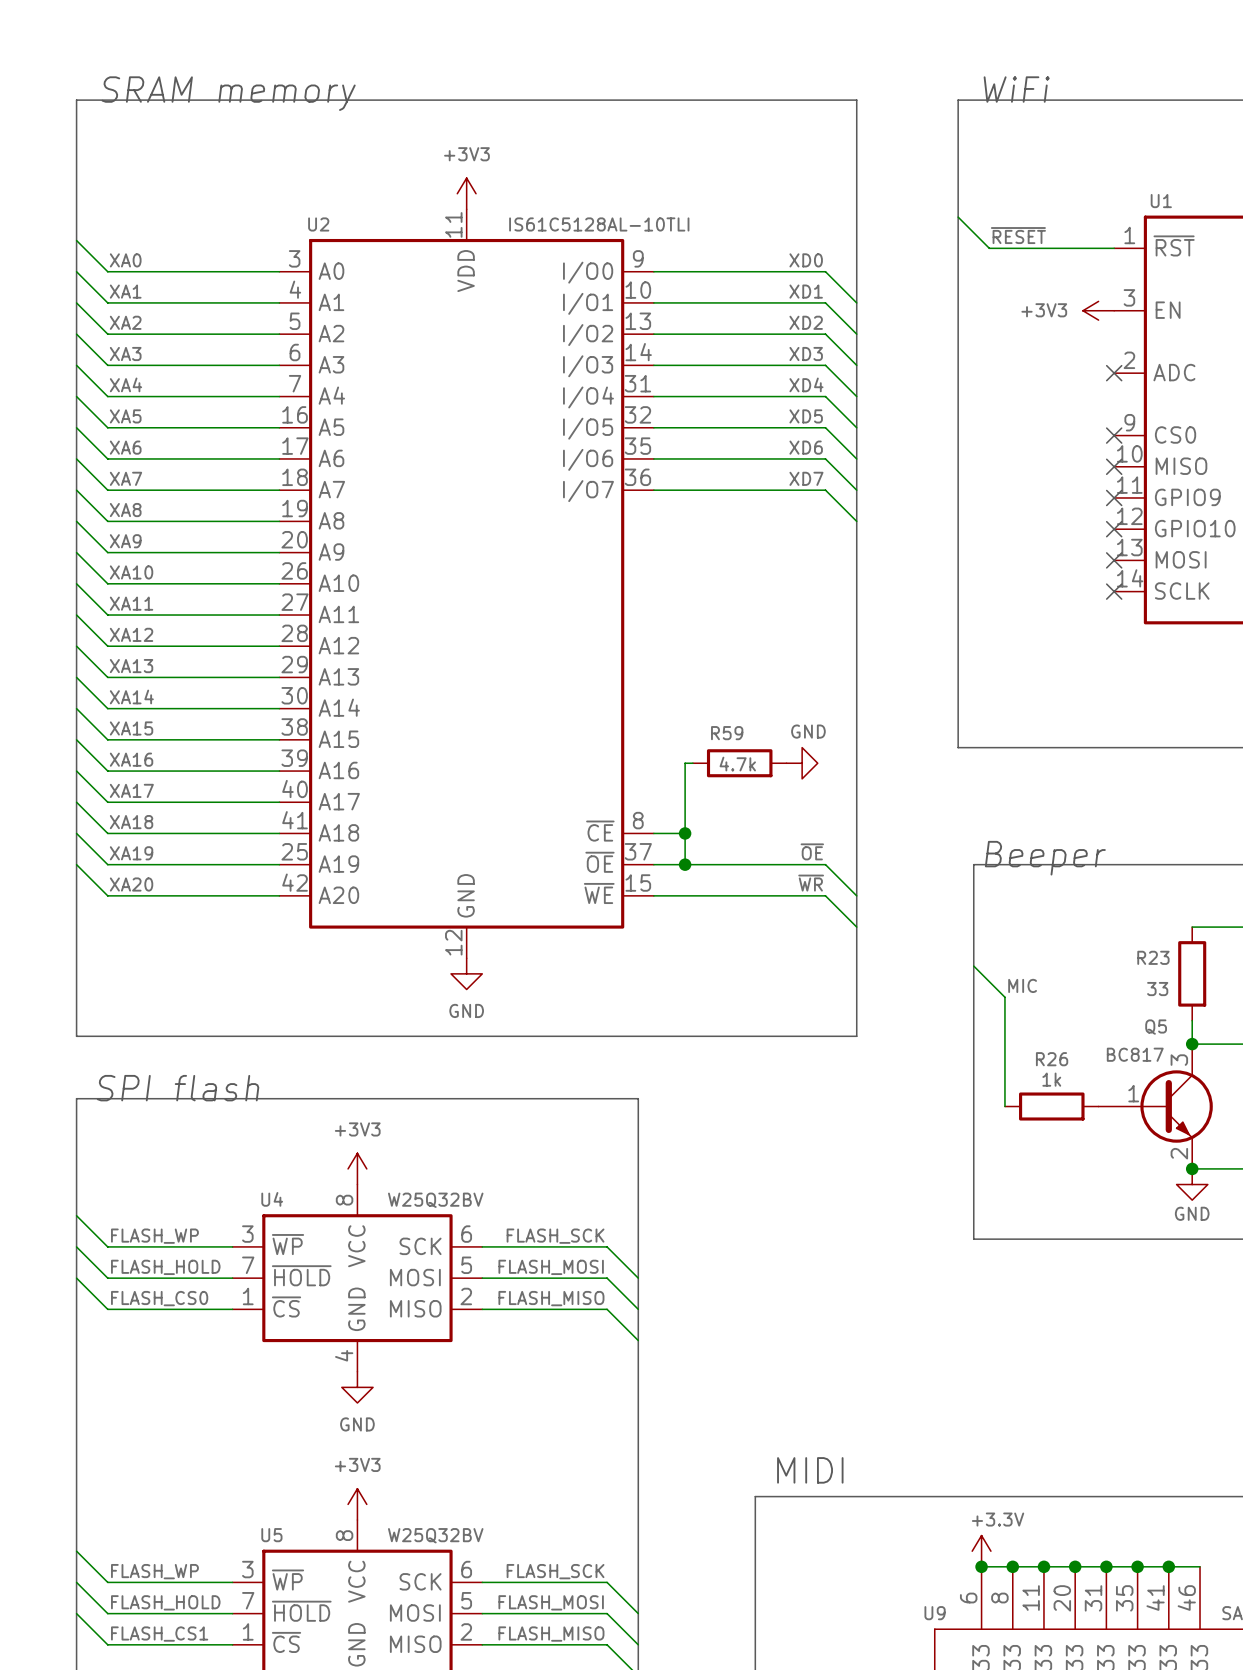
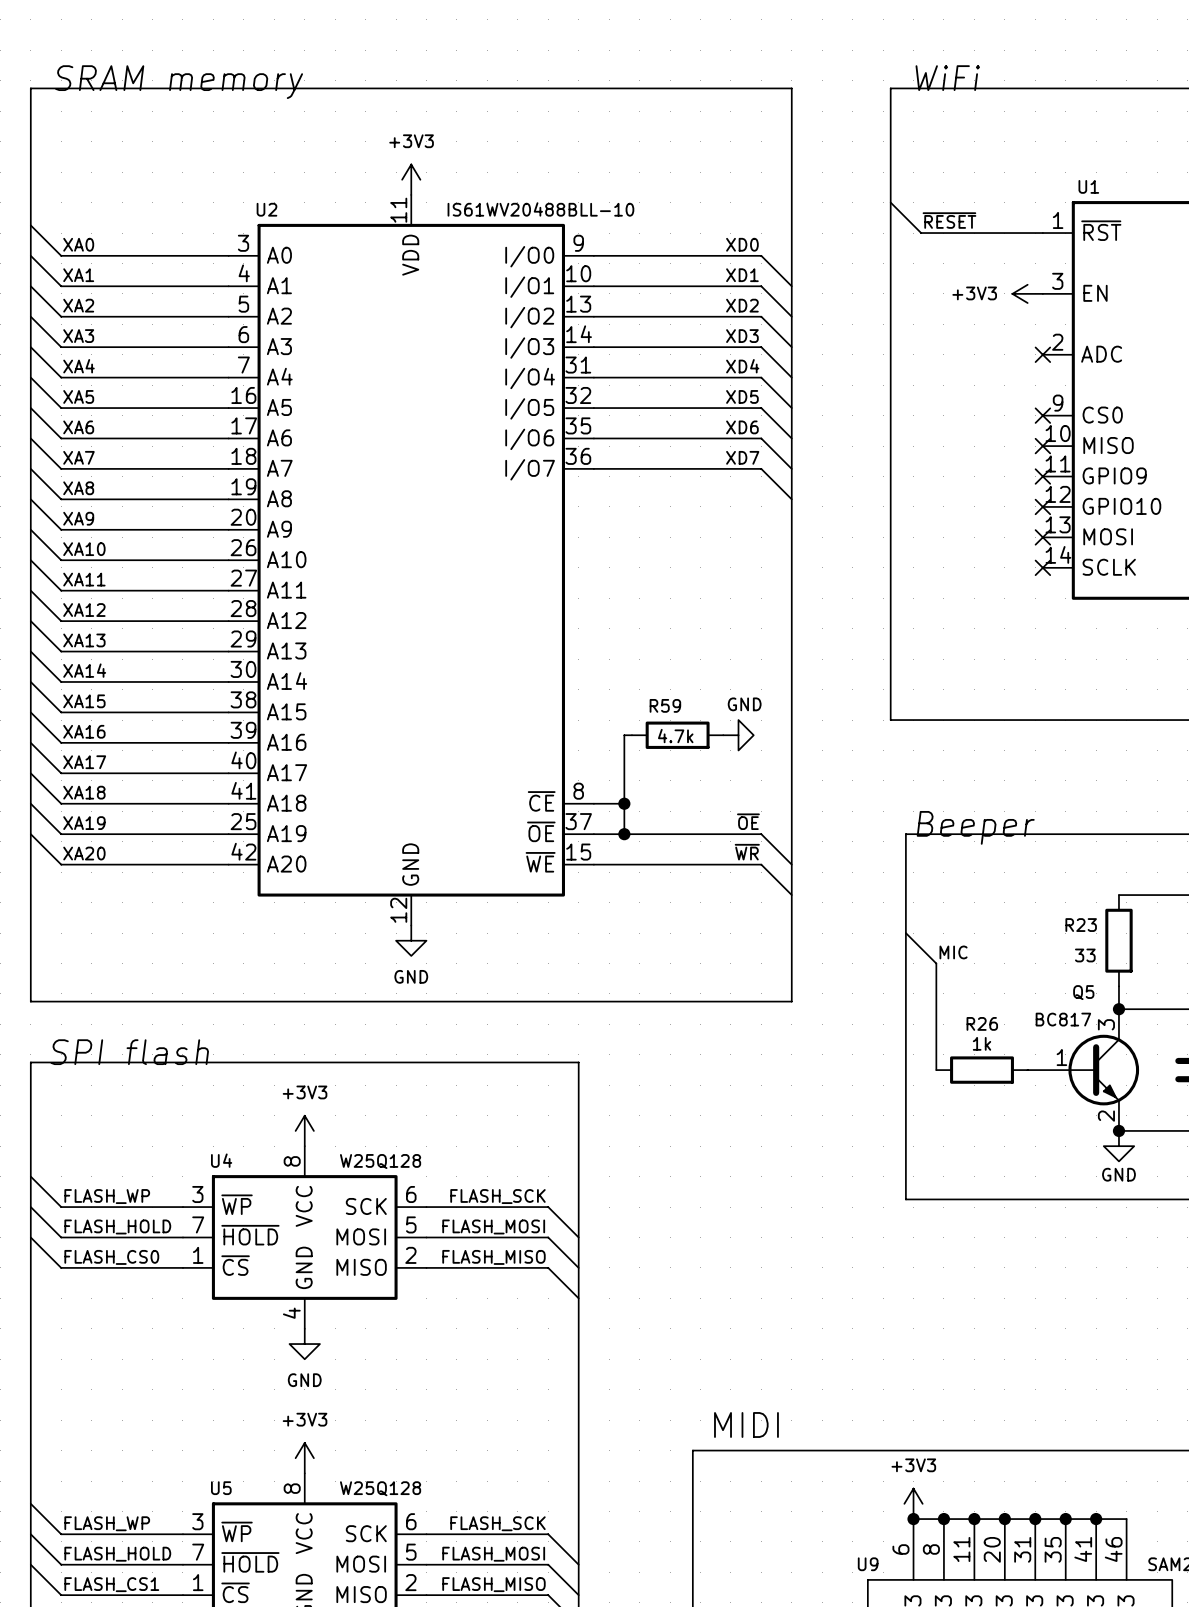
U2 value: IS61C5128AL-10TLI (599, 224) -> IS61WV20488BLL-10 (540, 209)
U4 value: W25Q32BV (435, 1200) -> W25Q128 (380, 1161)
U5 value: W25Q32BV (435, 1535) -> W25Q128 (380, 1488)
power symbol: +3.3V (981, 1551) -> +3V3 (913, 1503)

